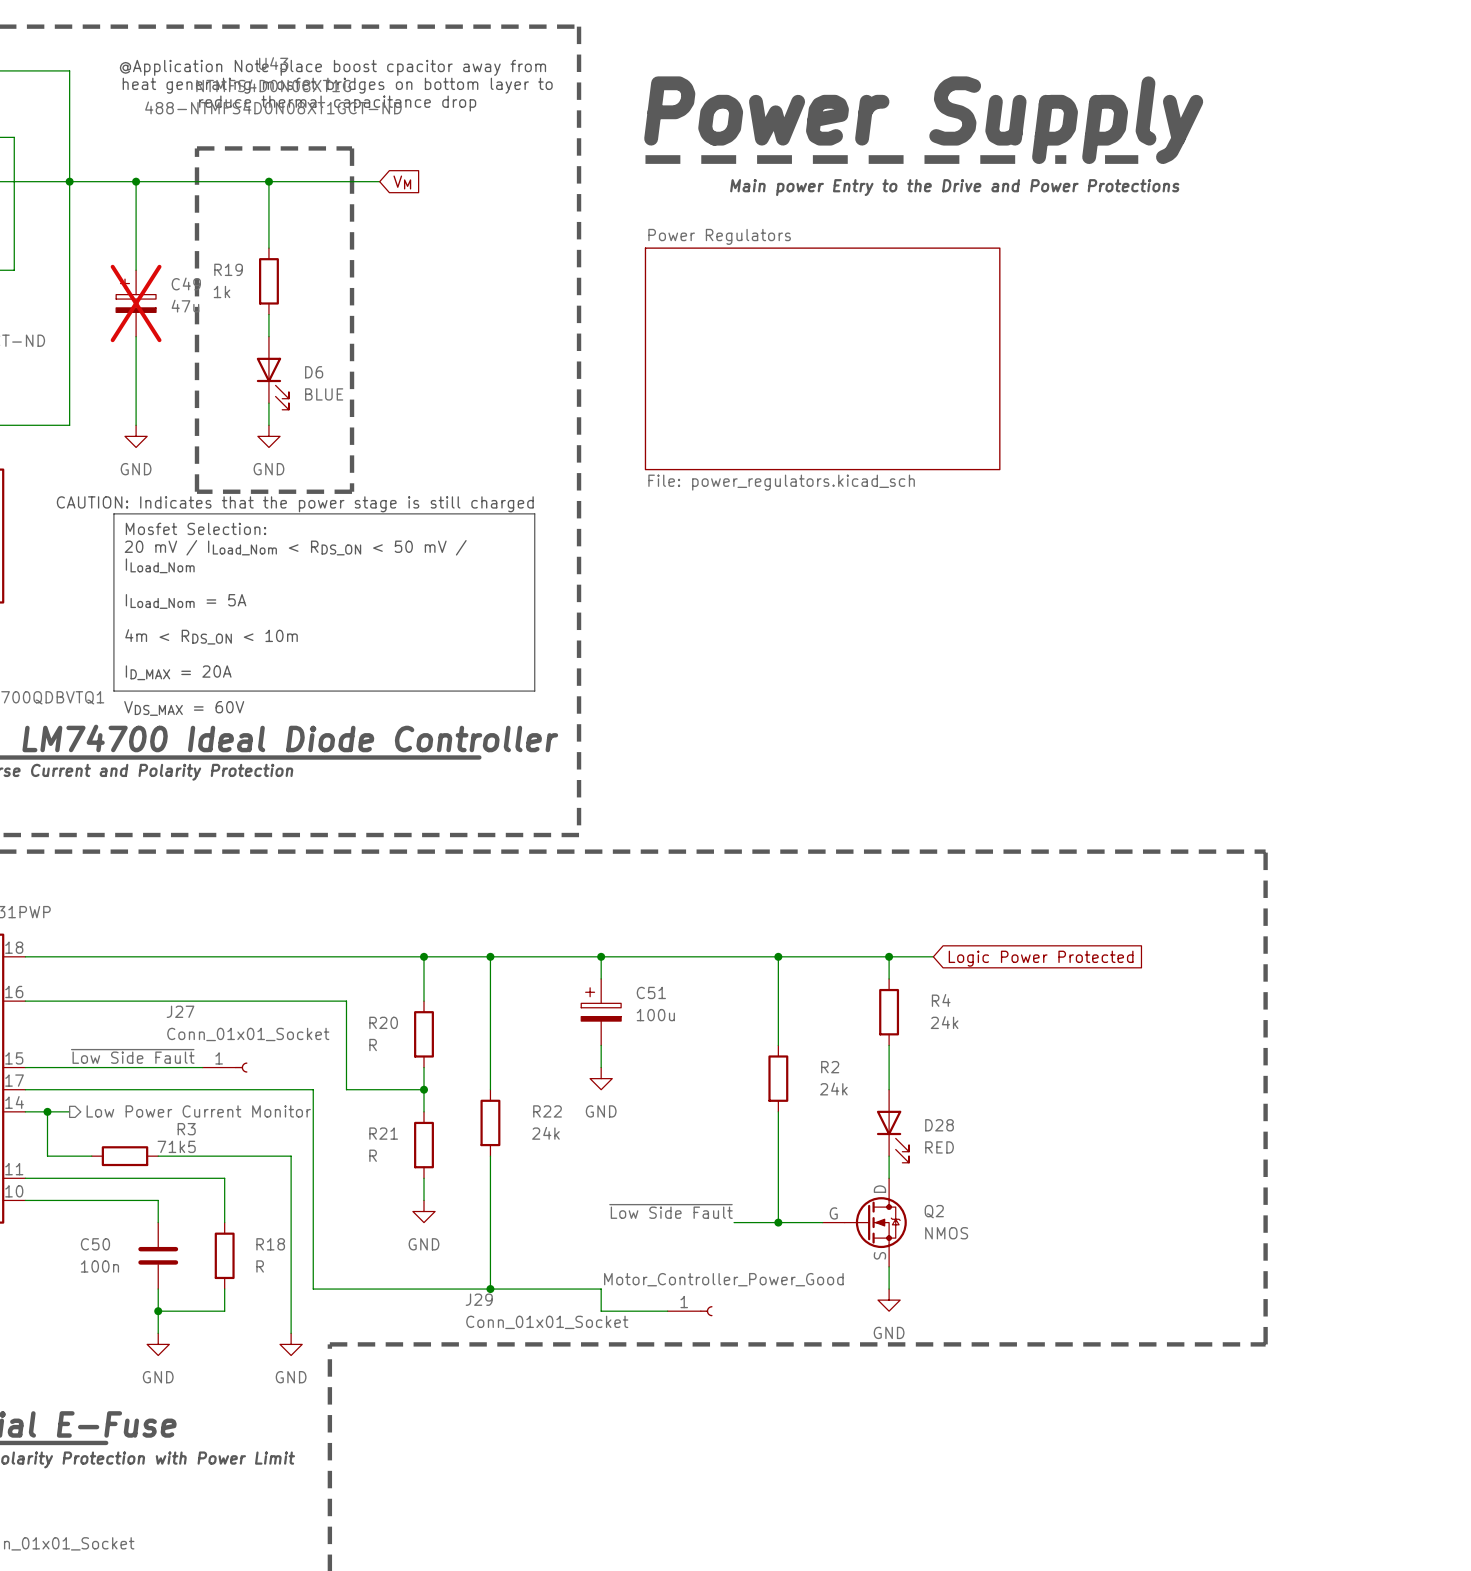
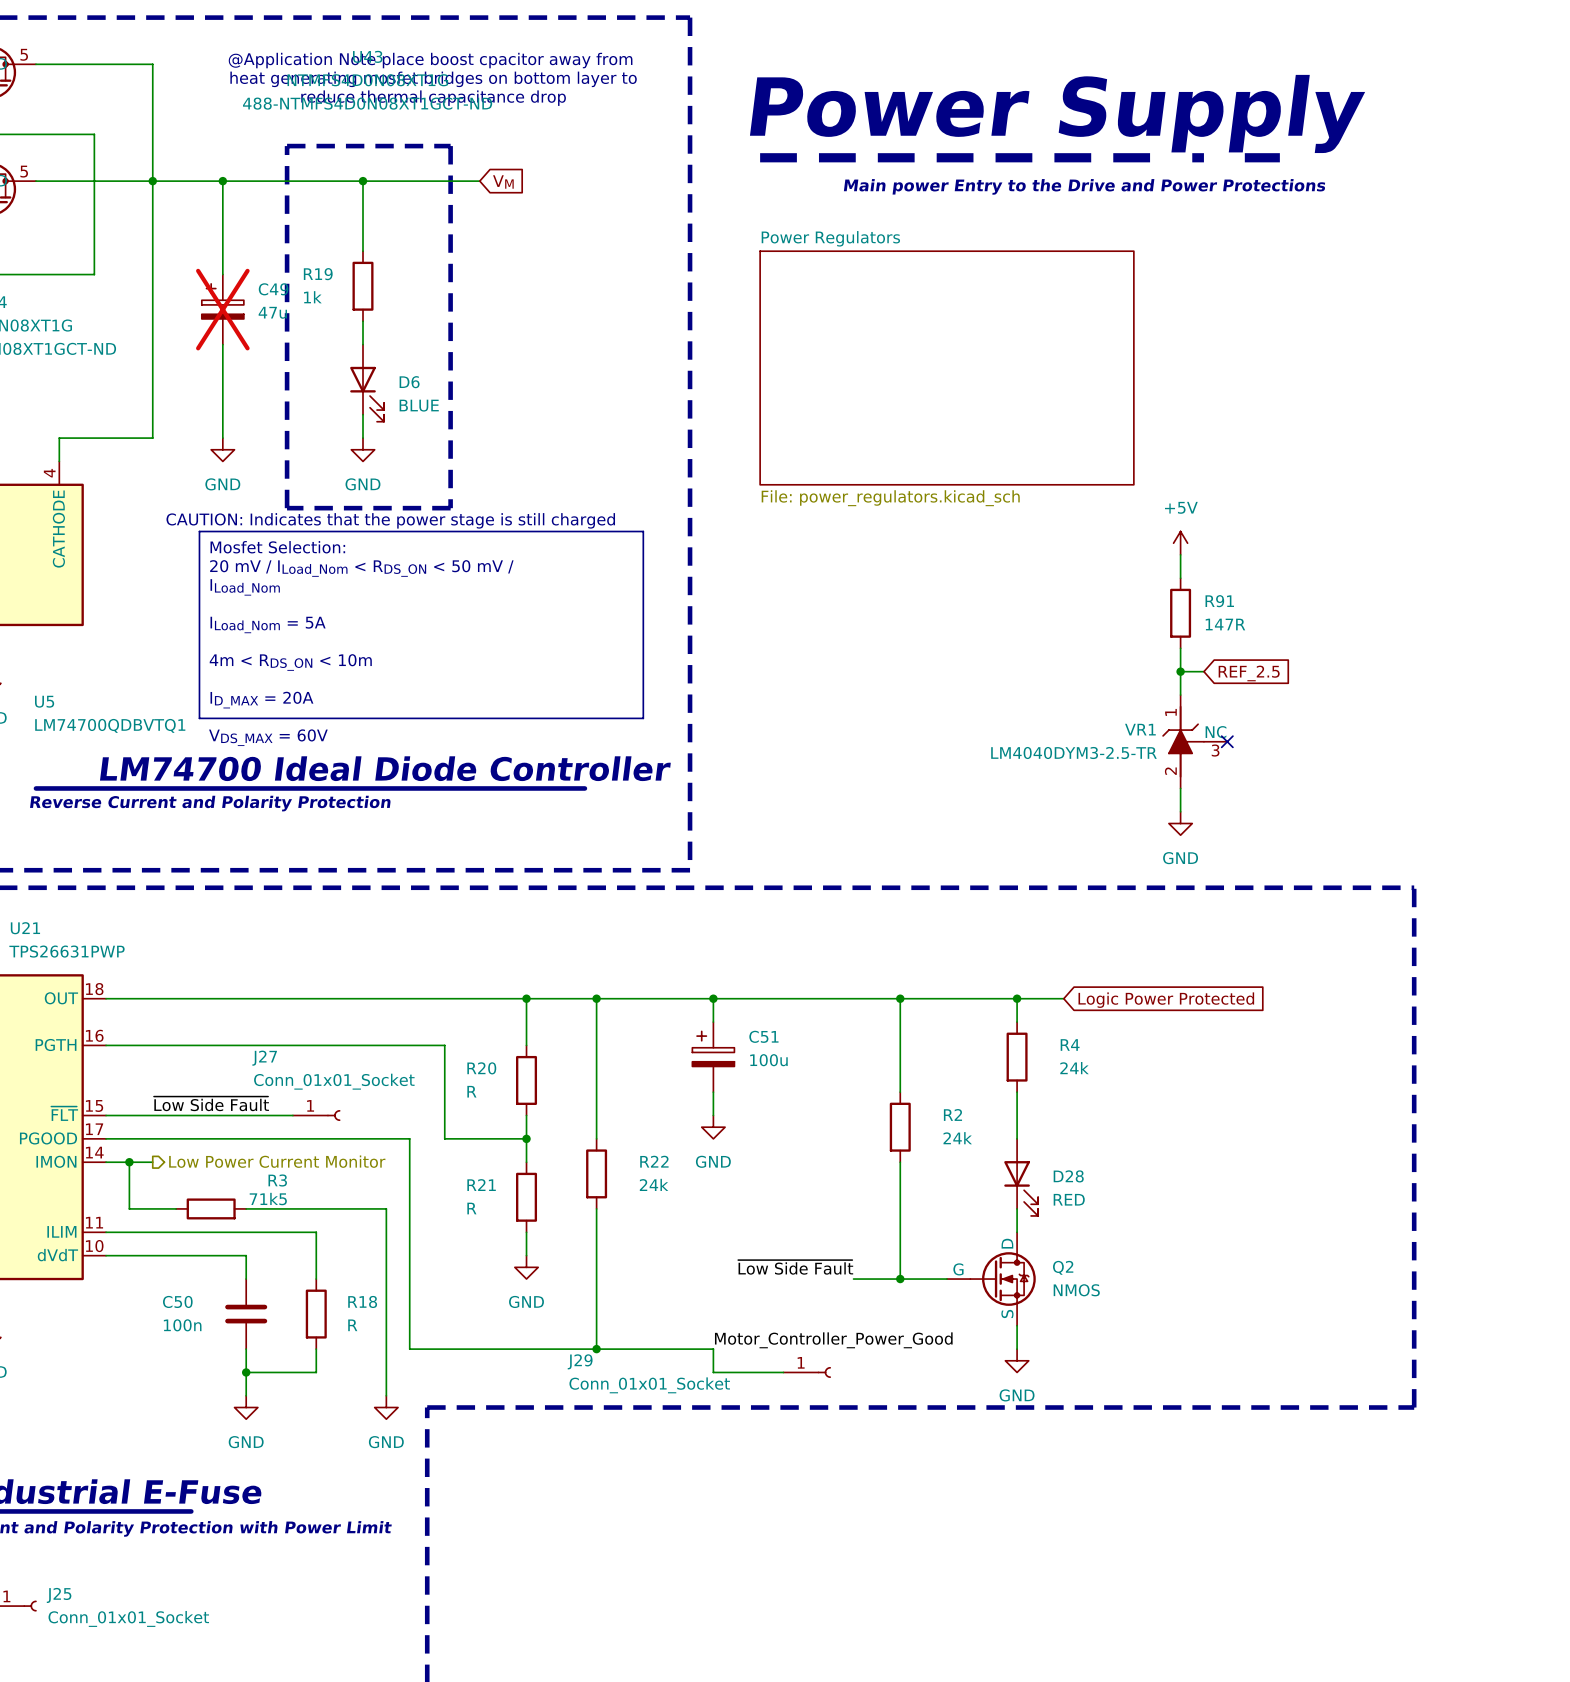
power symbol: none -> +5V (1180, 543)
wire: none -> (1180, 554) (1180, 578)
R91: none -> 147R (1180, 613)
wire: none -> (1180, 648) (1180, 695)
wire: none -> (1180, 671) (1203, 671)
junction: none -> (1180, 671)
global label: none -> REF_2.5 (1249, 673)
VR1: none -> LM4040DYM3-2.5-TR (1195, 741)
no-connect mark: none -> (1227, 741)
wire: none -> (1180, 788) (1180, 811)
power symbol: none -> GND (1180, 823)

